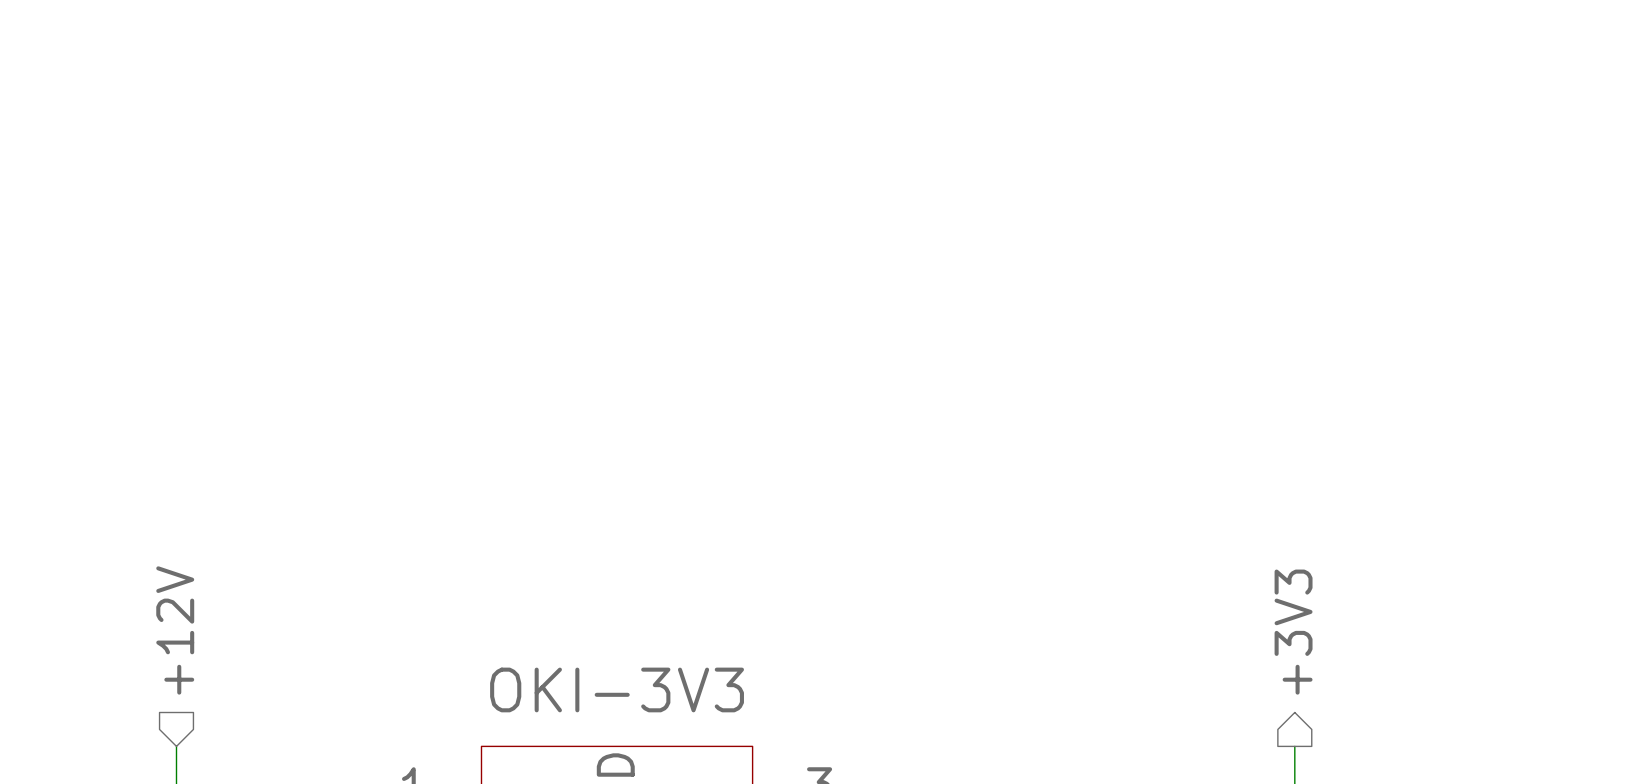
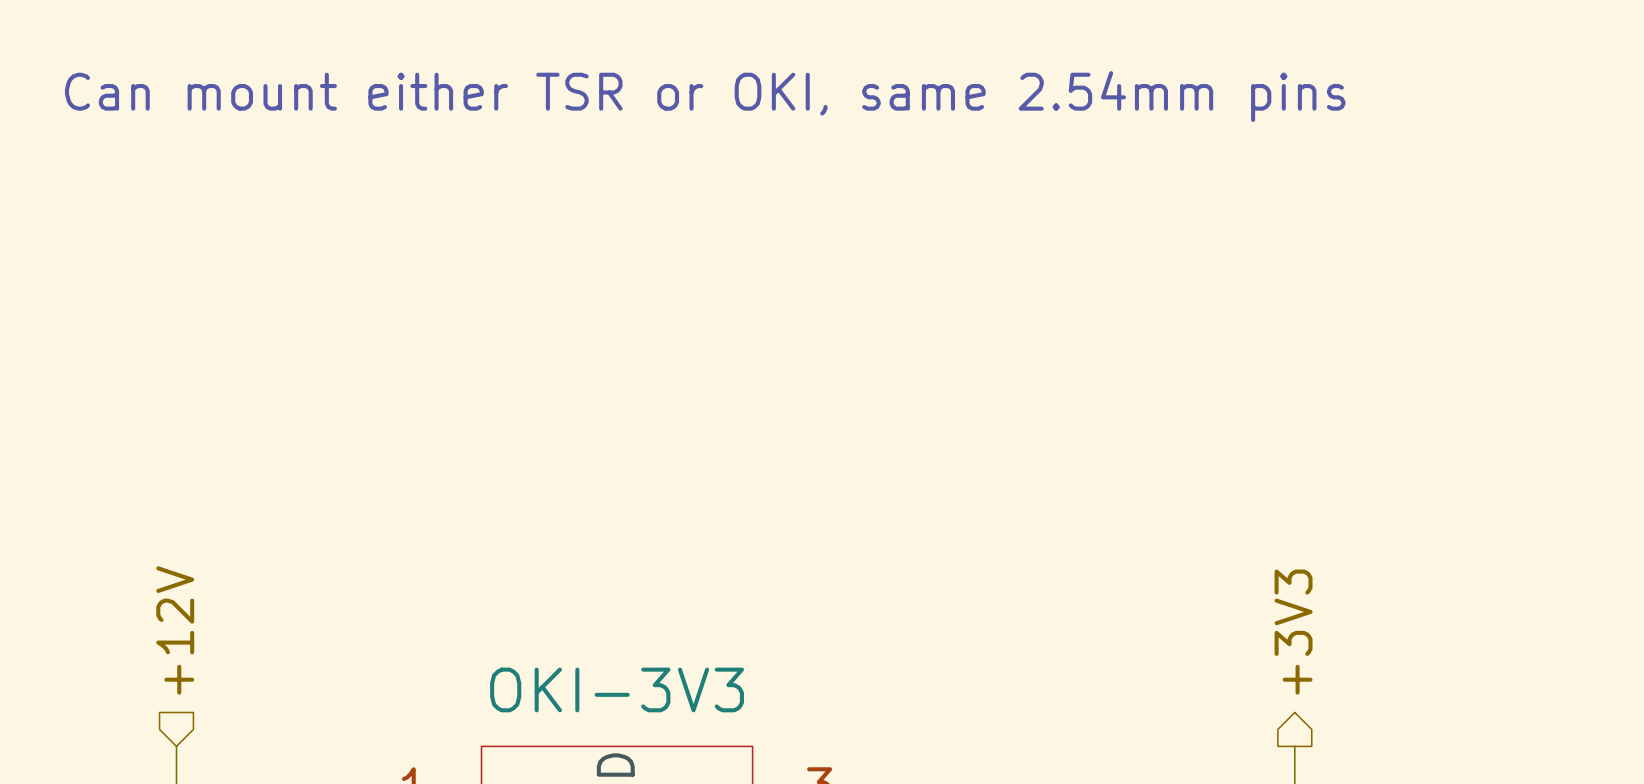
text: none -> Can mount either TSR or OKI, same 2.54mm pins (705, 96)

